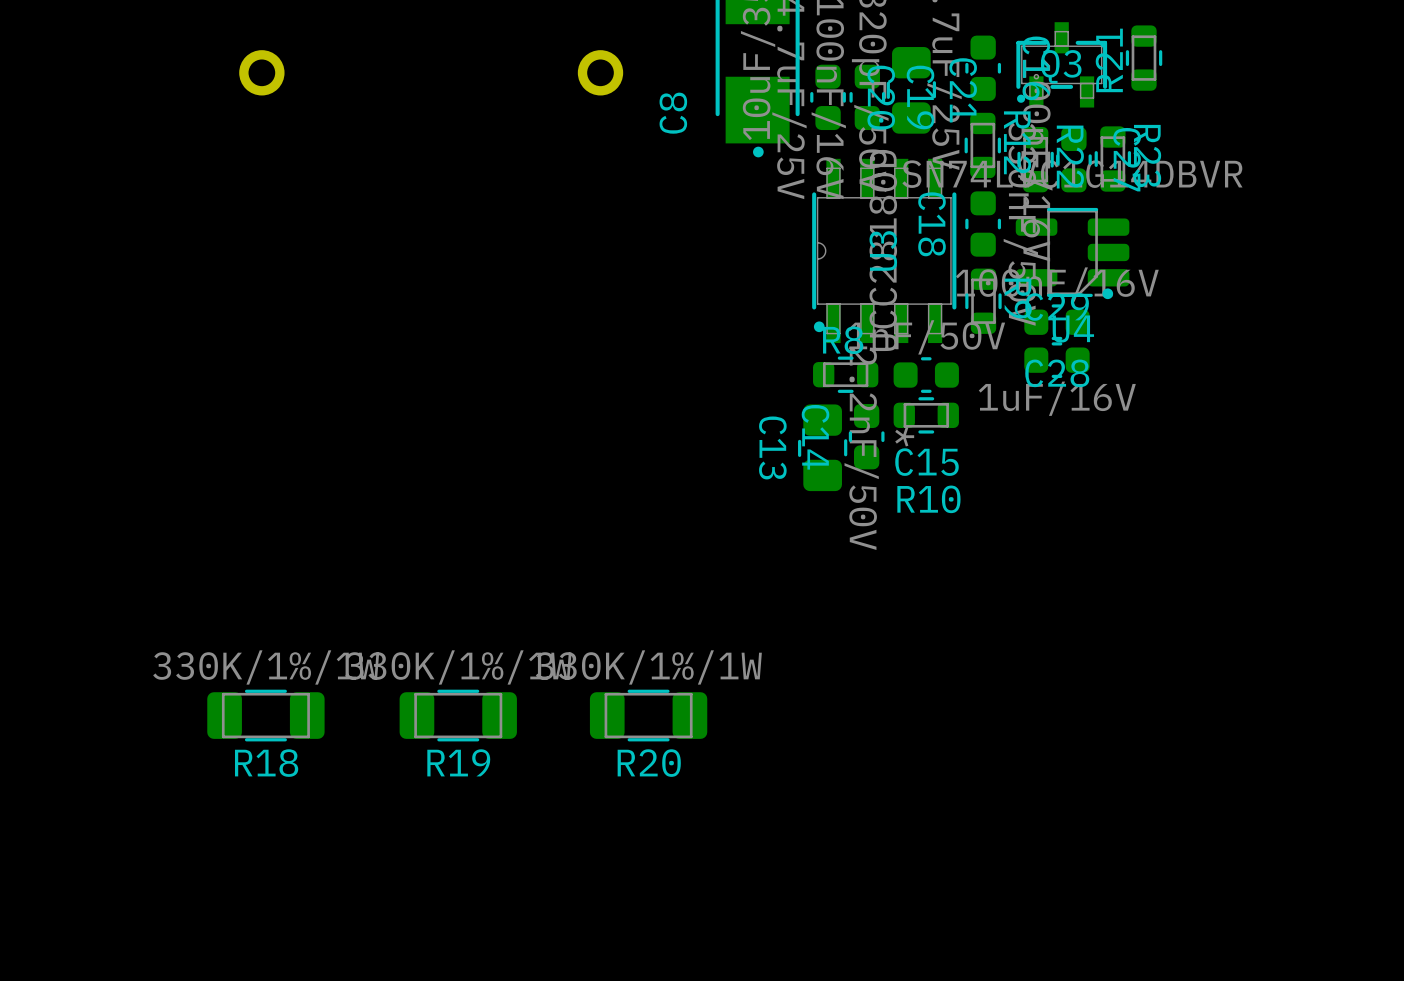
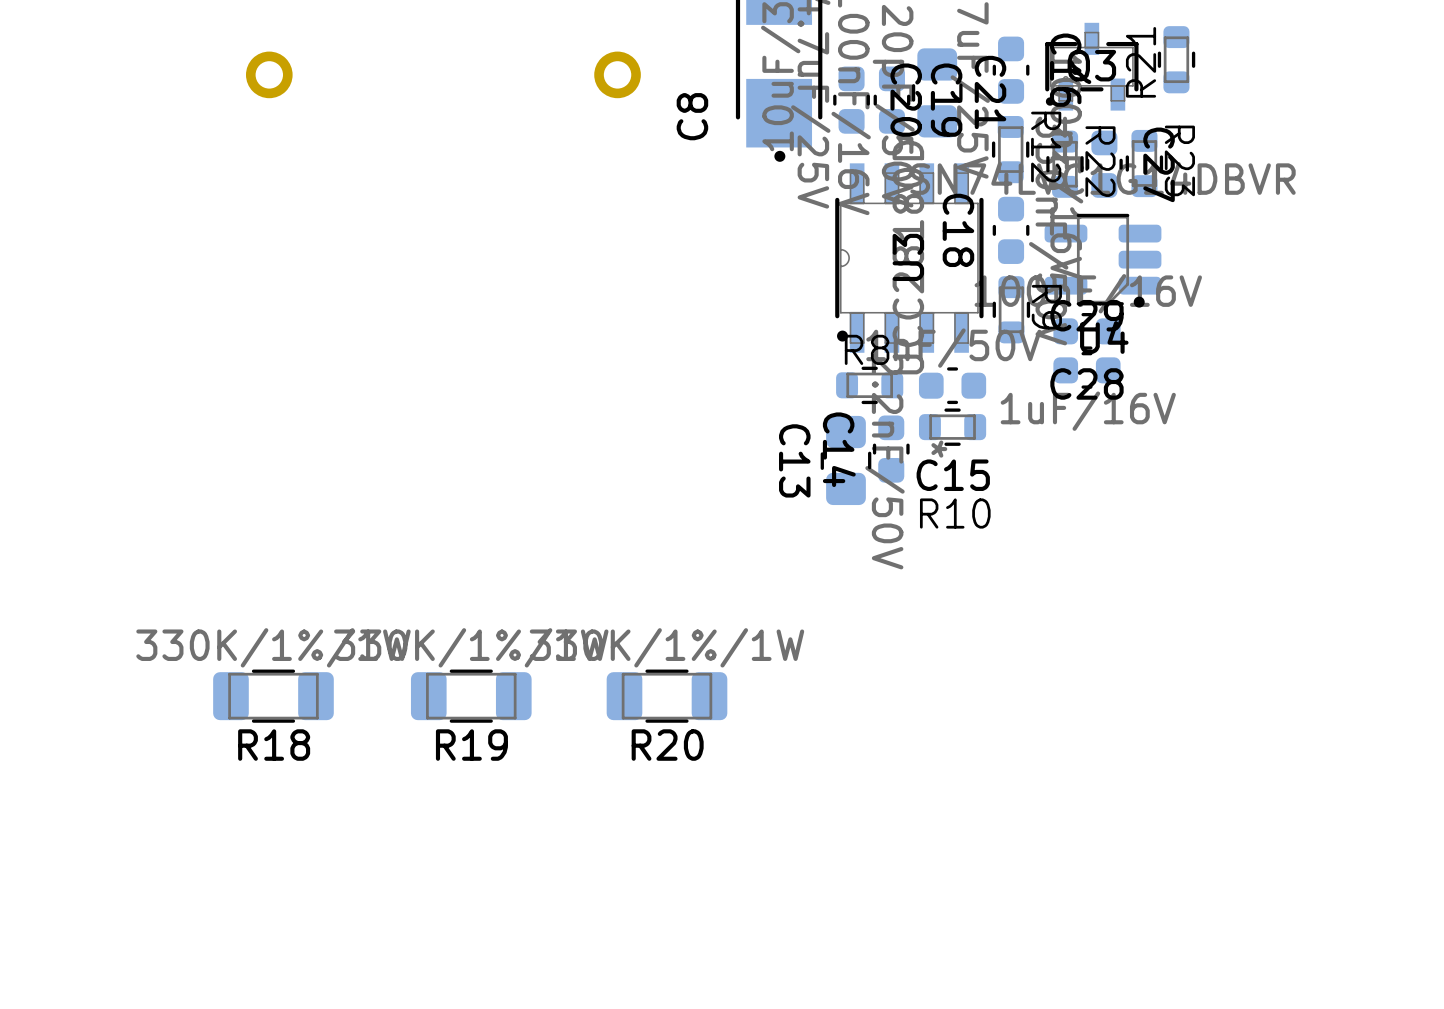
R18 position: (265, 715) -> (273, 696)
R19 position: (458, 715) -> (471, 696)
R20 position: (648, 715) -> (666, 696)

